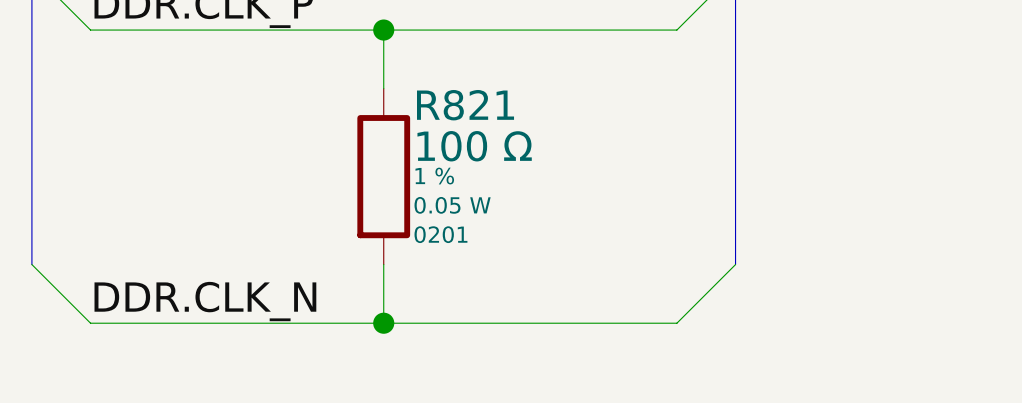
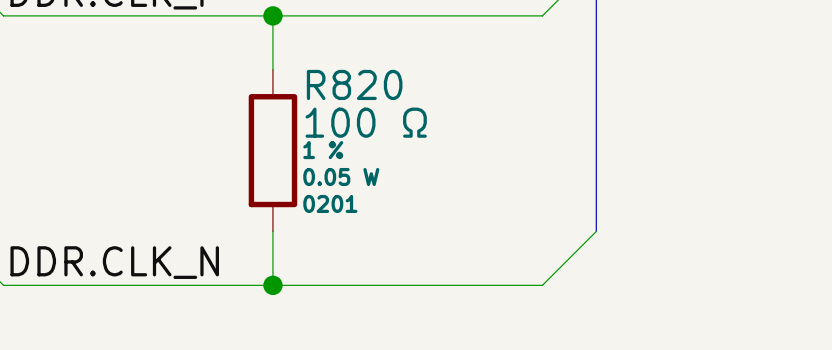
R821 name: R821 (465, 105) -> R820 (354, 84)

